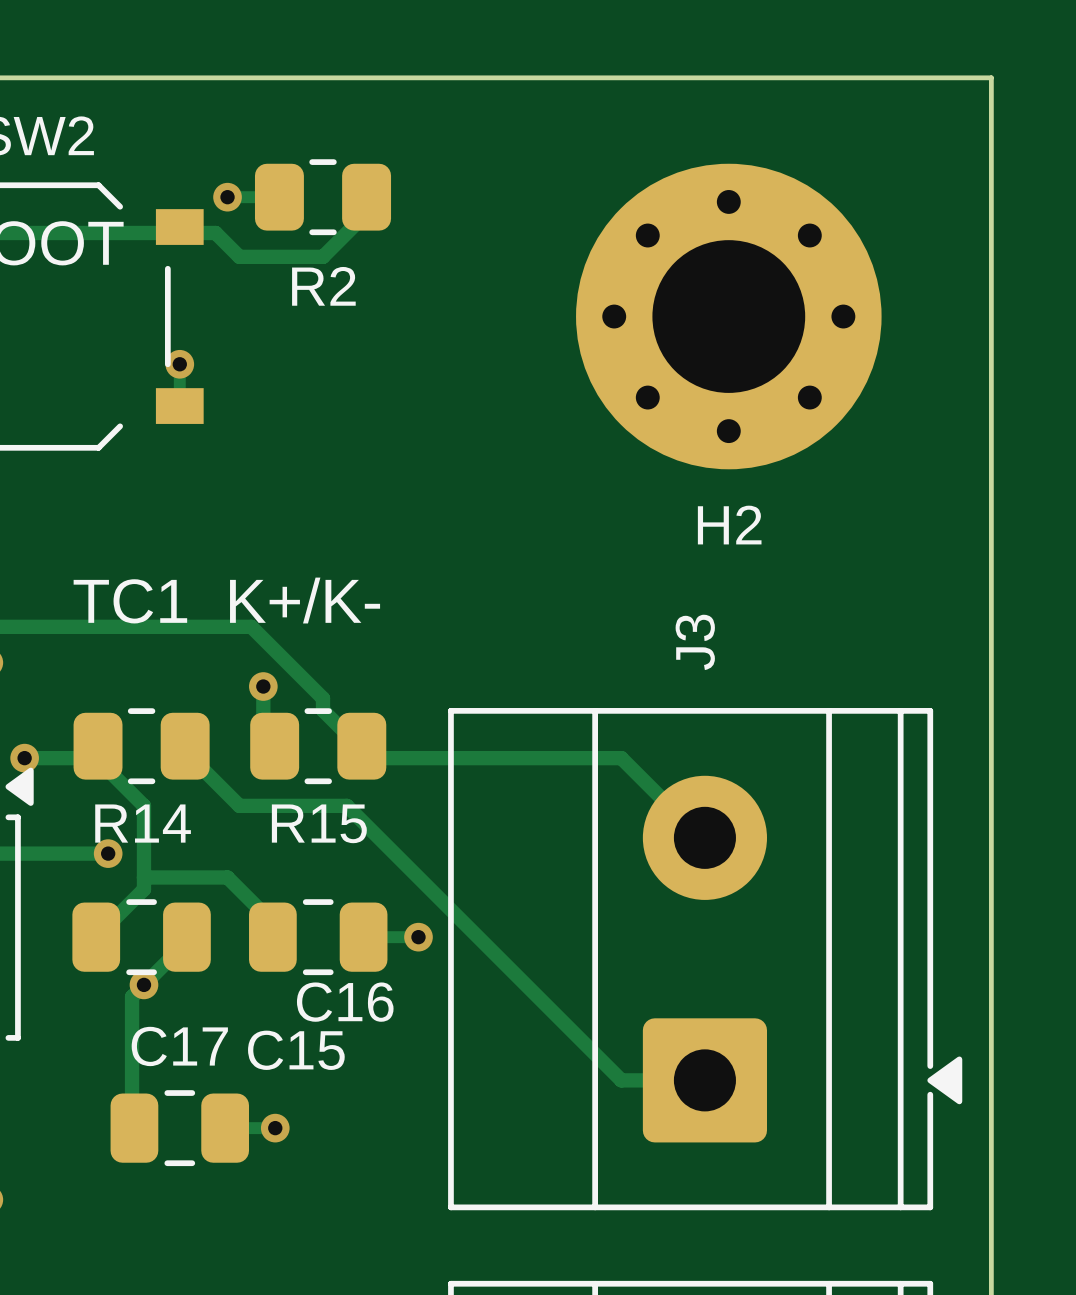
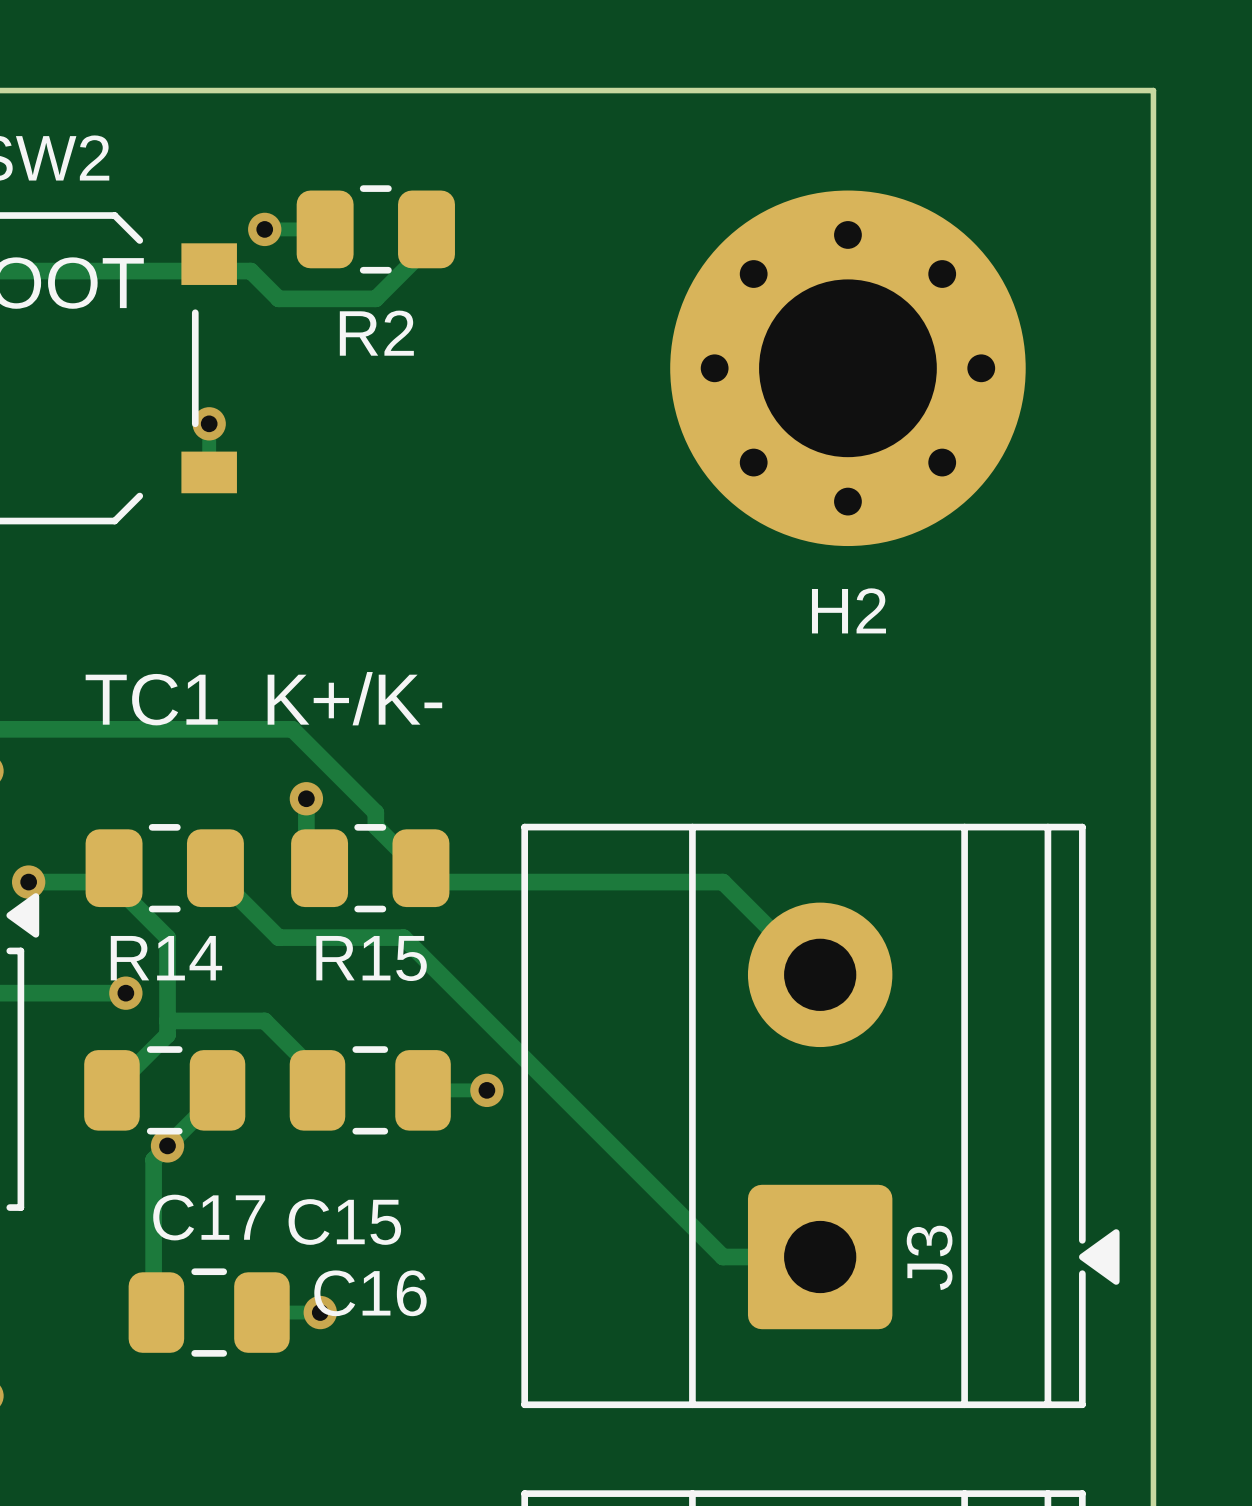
J3 name position: J3 (695, 642) -> J3 (929, 1257)
C16 name position: C16 (345, 1002) -> C16 (370, 1293)

